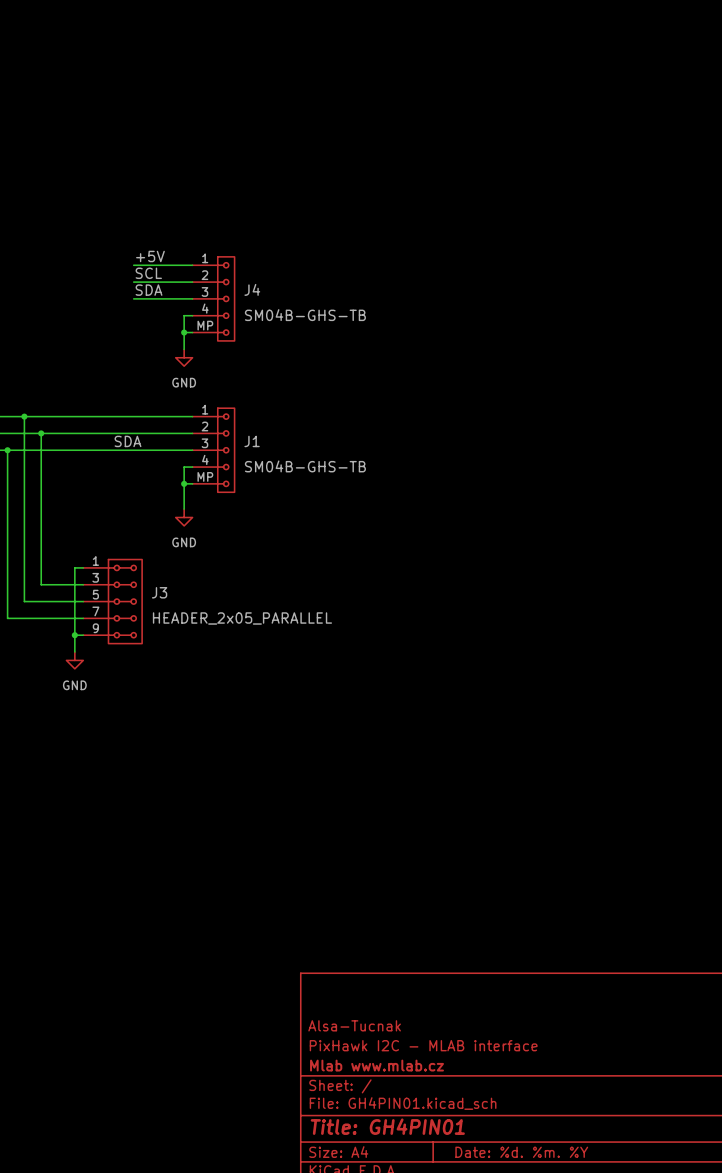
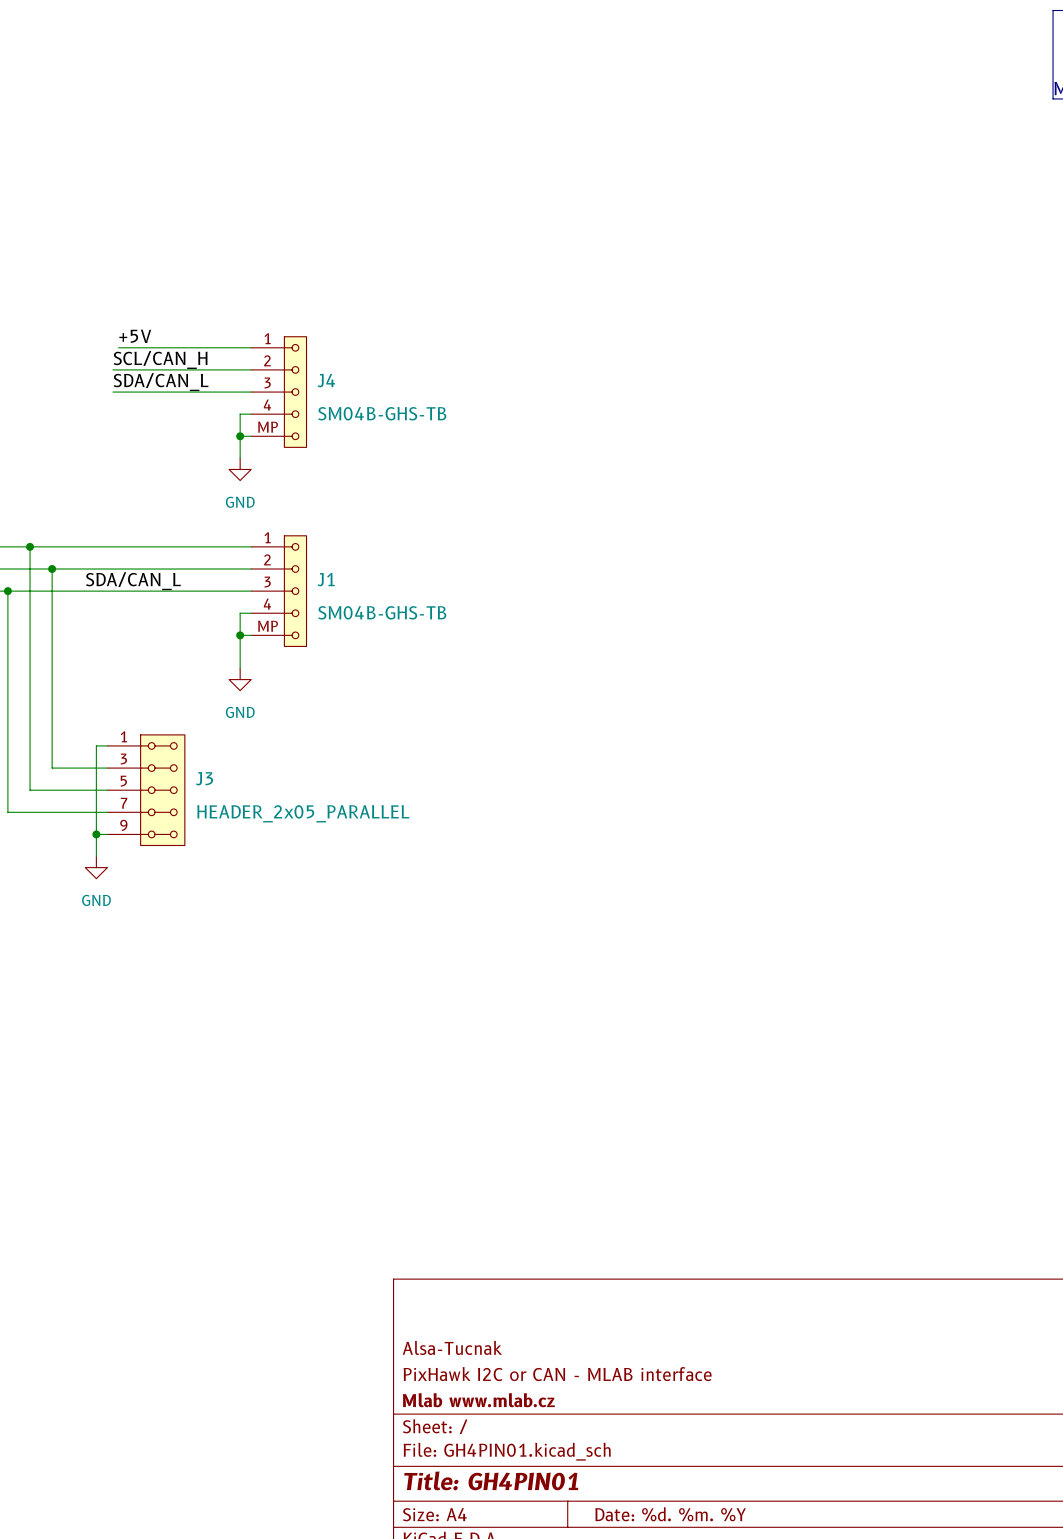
label position: +5V (150, 256) -> +5V (135, 336)
wire: none -> (118, 347) (173, 347)
label: SCL (148, 273) -> none
label: none -> SCL/CAN_H (160, 359)
wire: none -> (112, 369) (173, 369)
label: SDA (149, 290) -> none
label: none -> SDA/CAN_L (161, 382)
wire: none -> (112, 392) (173, 392)
label: SDA (128, 441) -> none
label: none -> SDA/CAN_L (133, 581)
title block: PixHawk I2C - MLAB interface (423, 1045) -> PixHawk I2C or CAN - MLAB interface (557, 1374)

